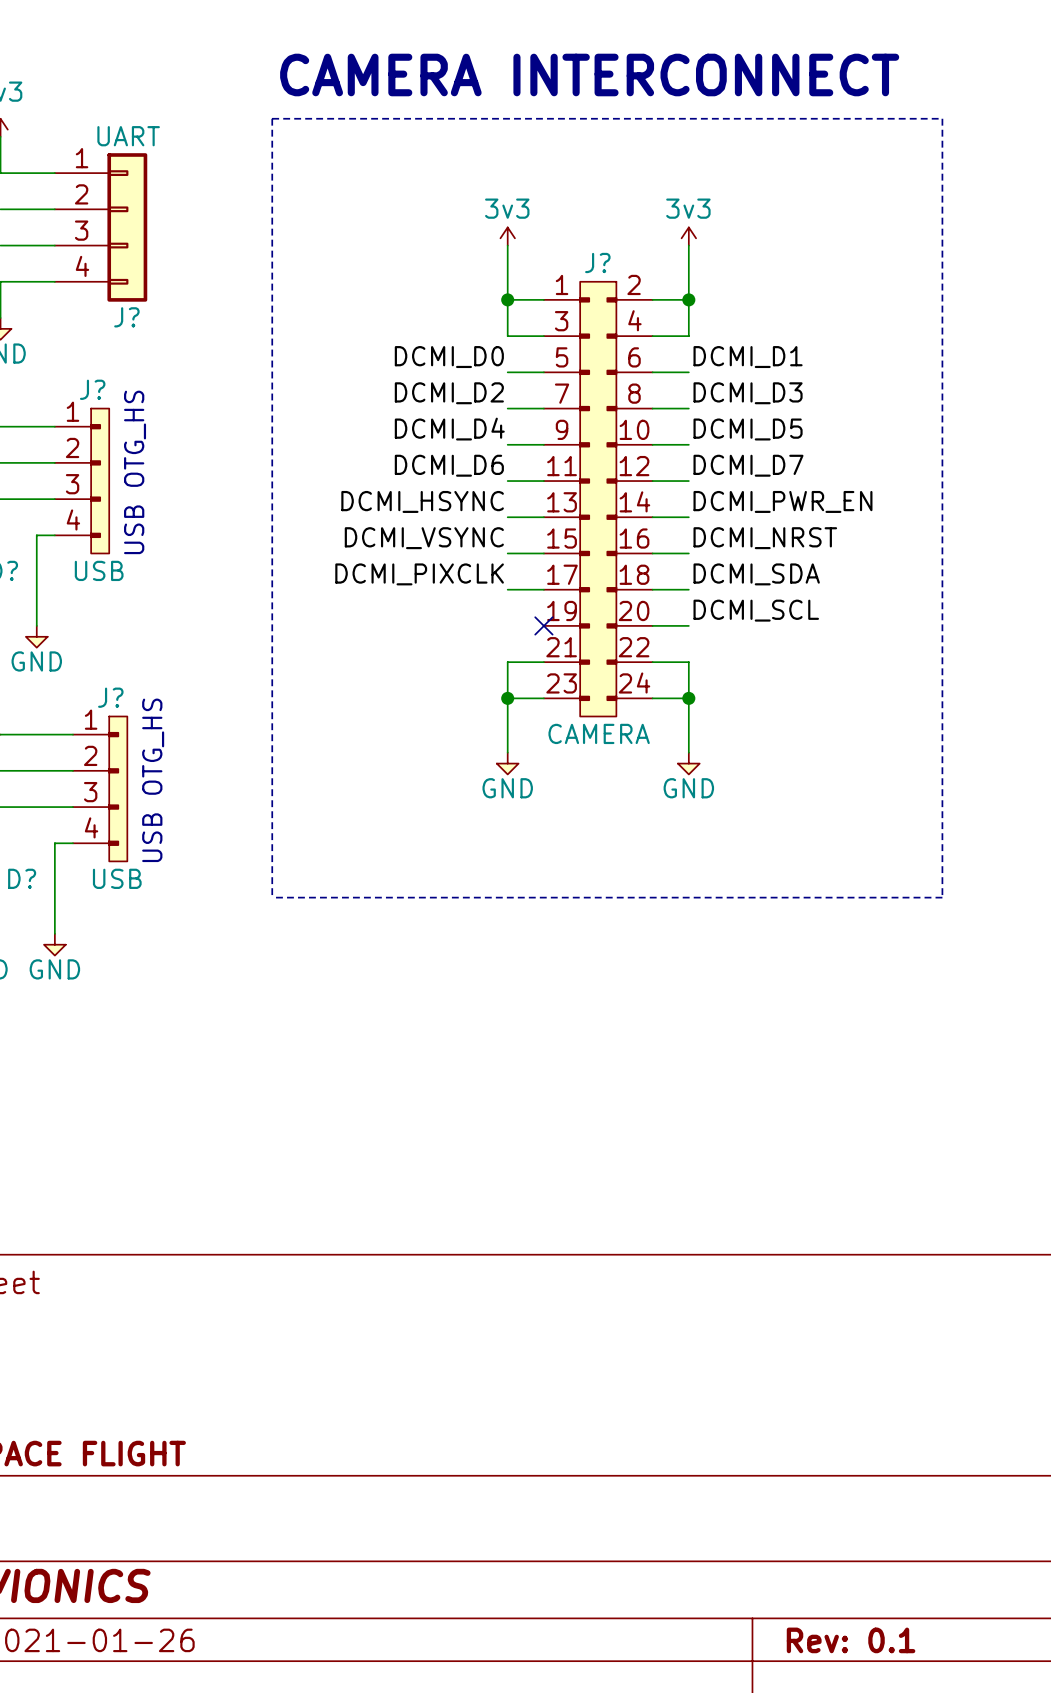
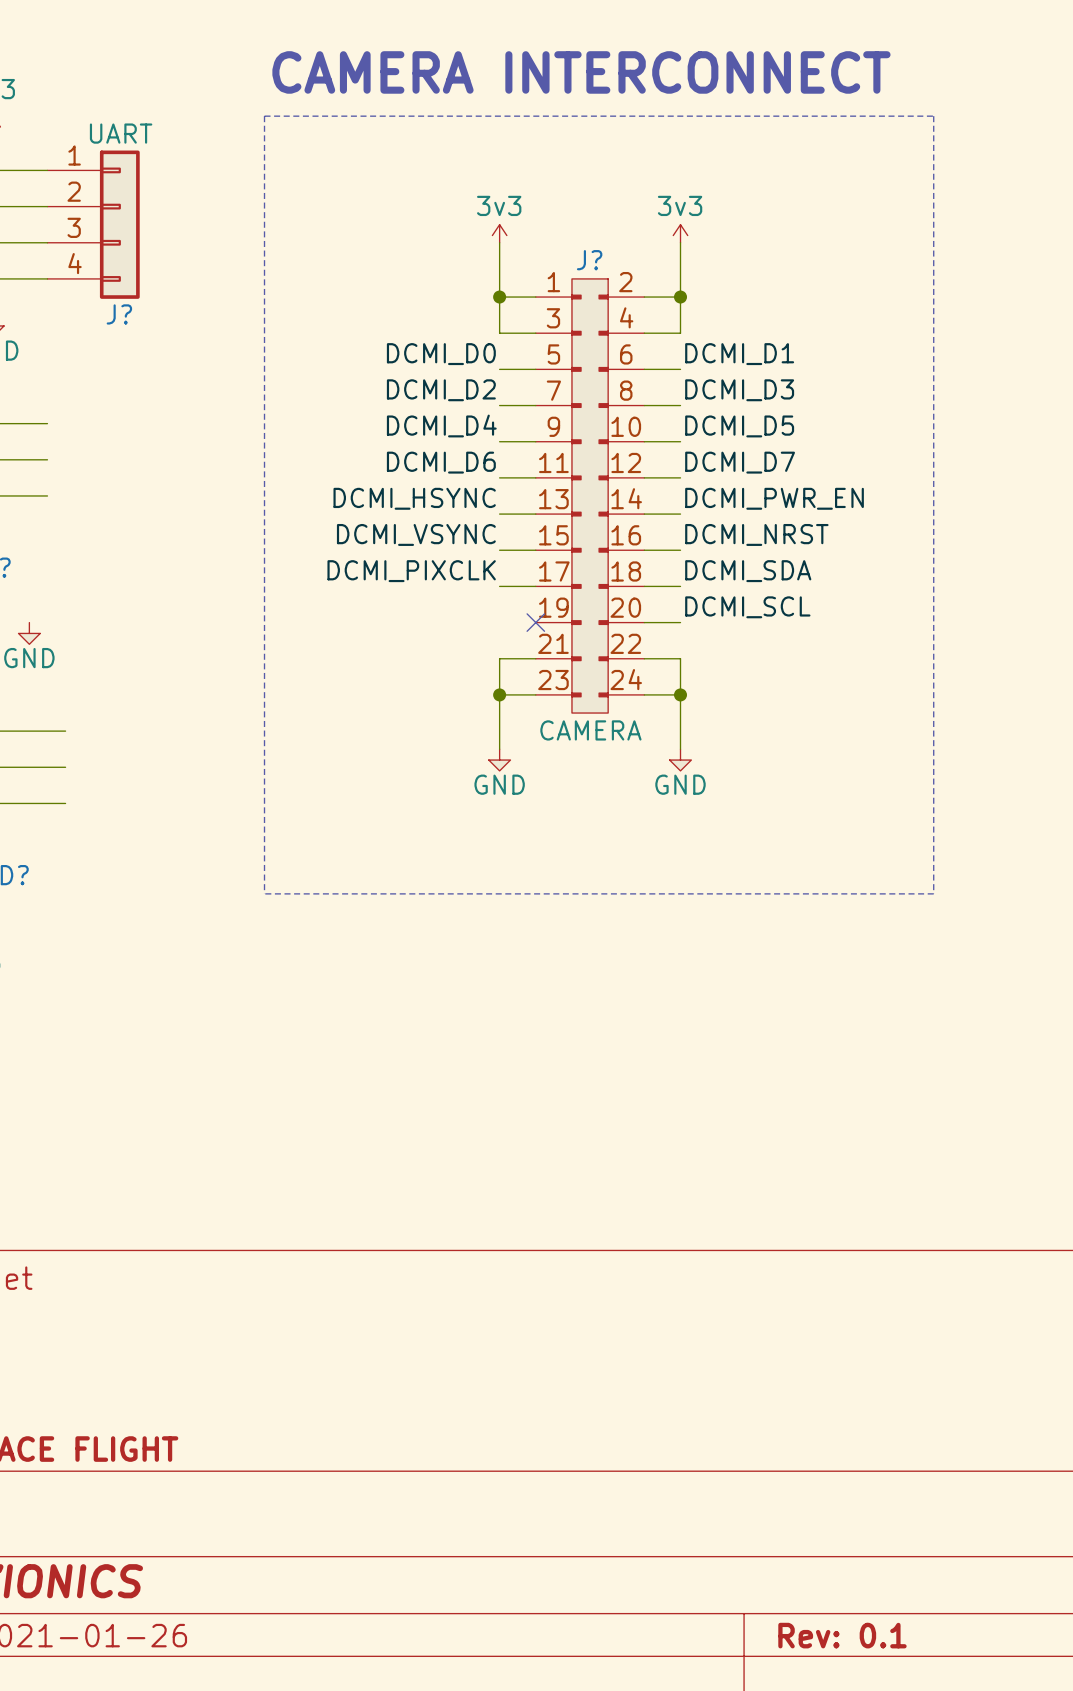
text: USB OTG_HS (135, 472) -> none
J?: USB (82, 481) -> none
wire: (54, 535) (36, 535) (36, 625) -> none
text: USB OTG_HS (153, 780) -> none
J?: USB (100, 788) -> none
wire: (72, 843) (54, 843) (54, 933) -> none
power symbol: GND (54, 944) -> none

